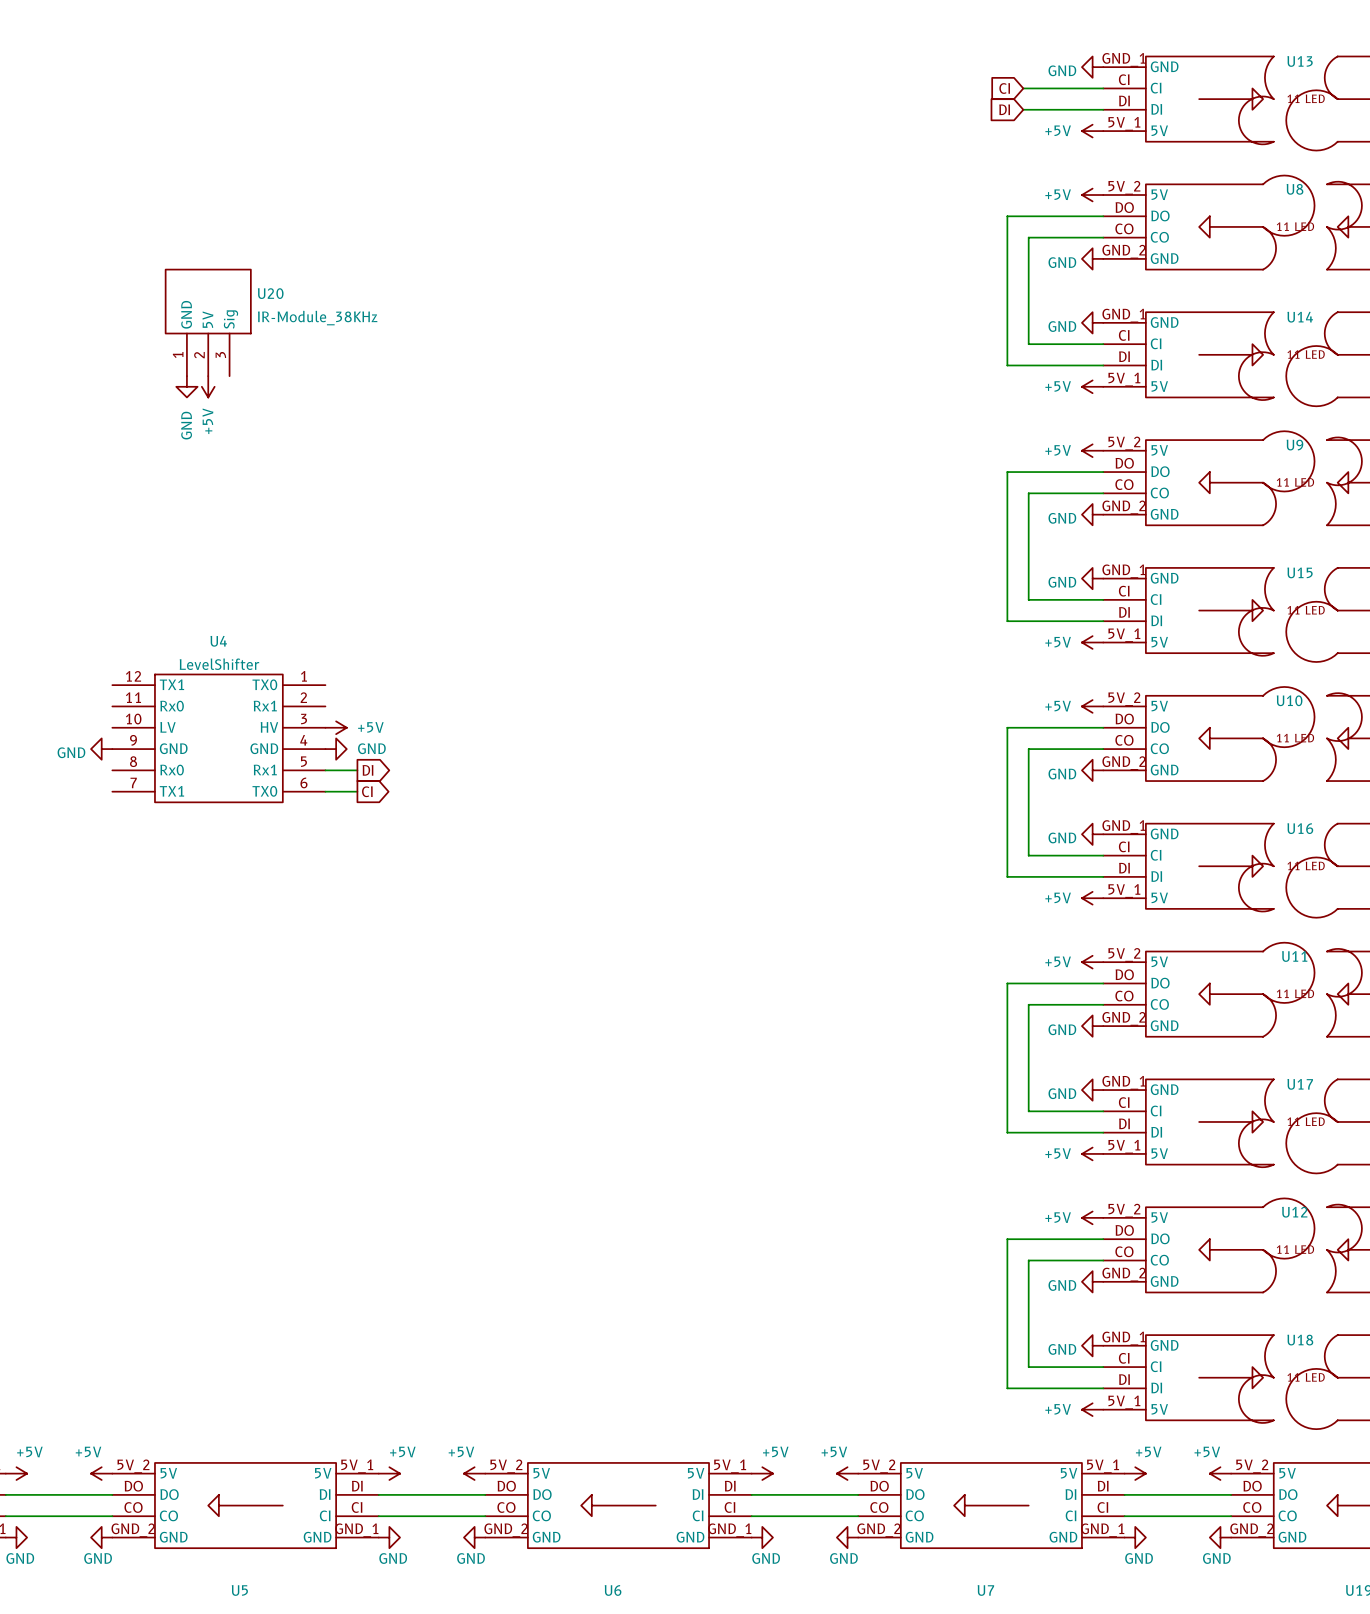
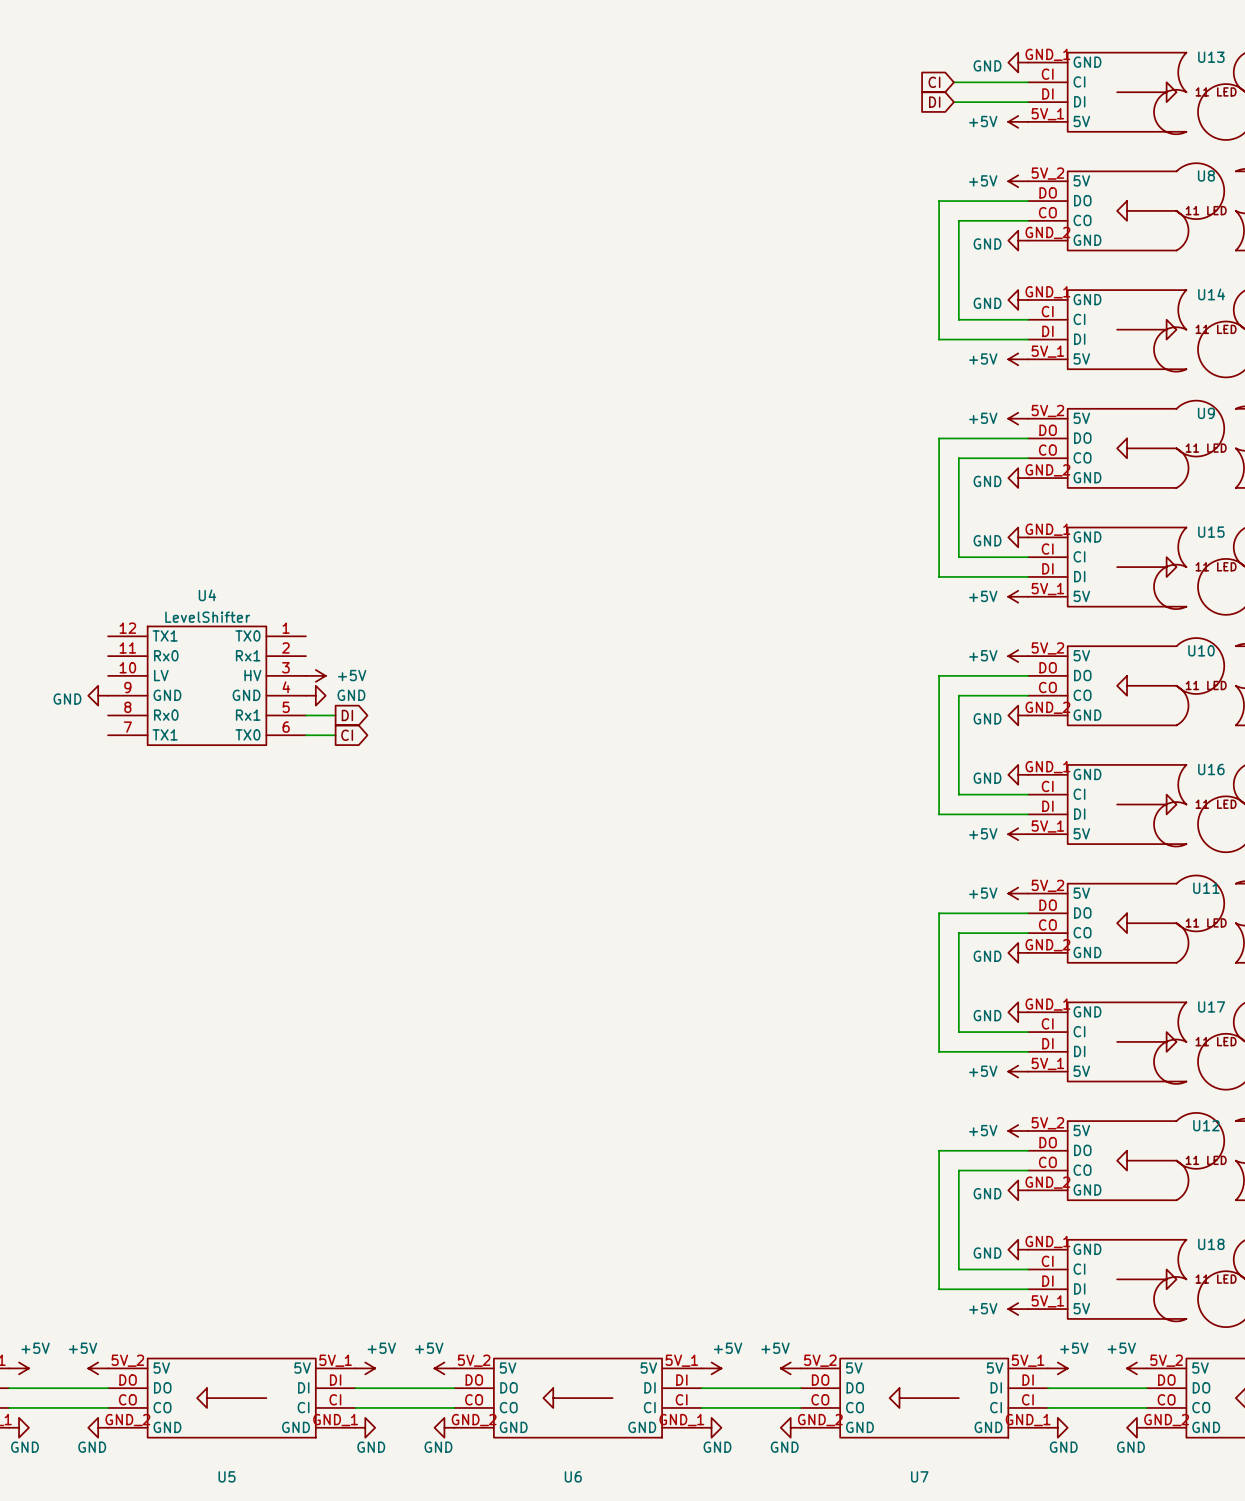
U20: IR-Module_38KHz (208, 322) -> none
power symbol: GND (186, 386) -> none
power symbol: +5V (208, 386) -> none

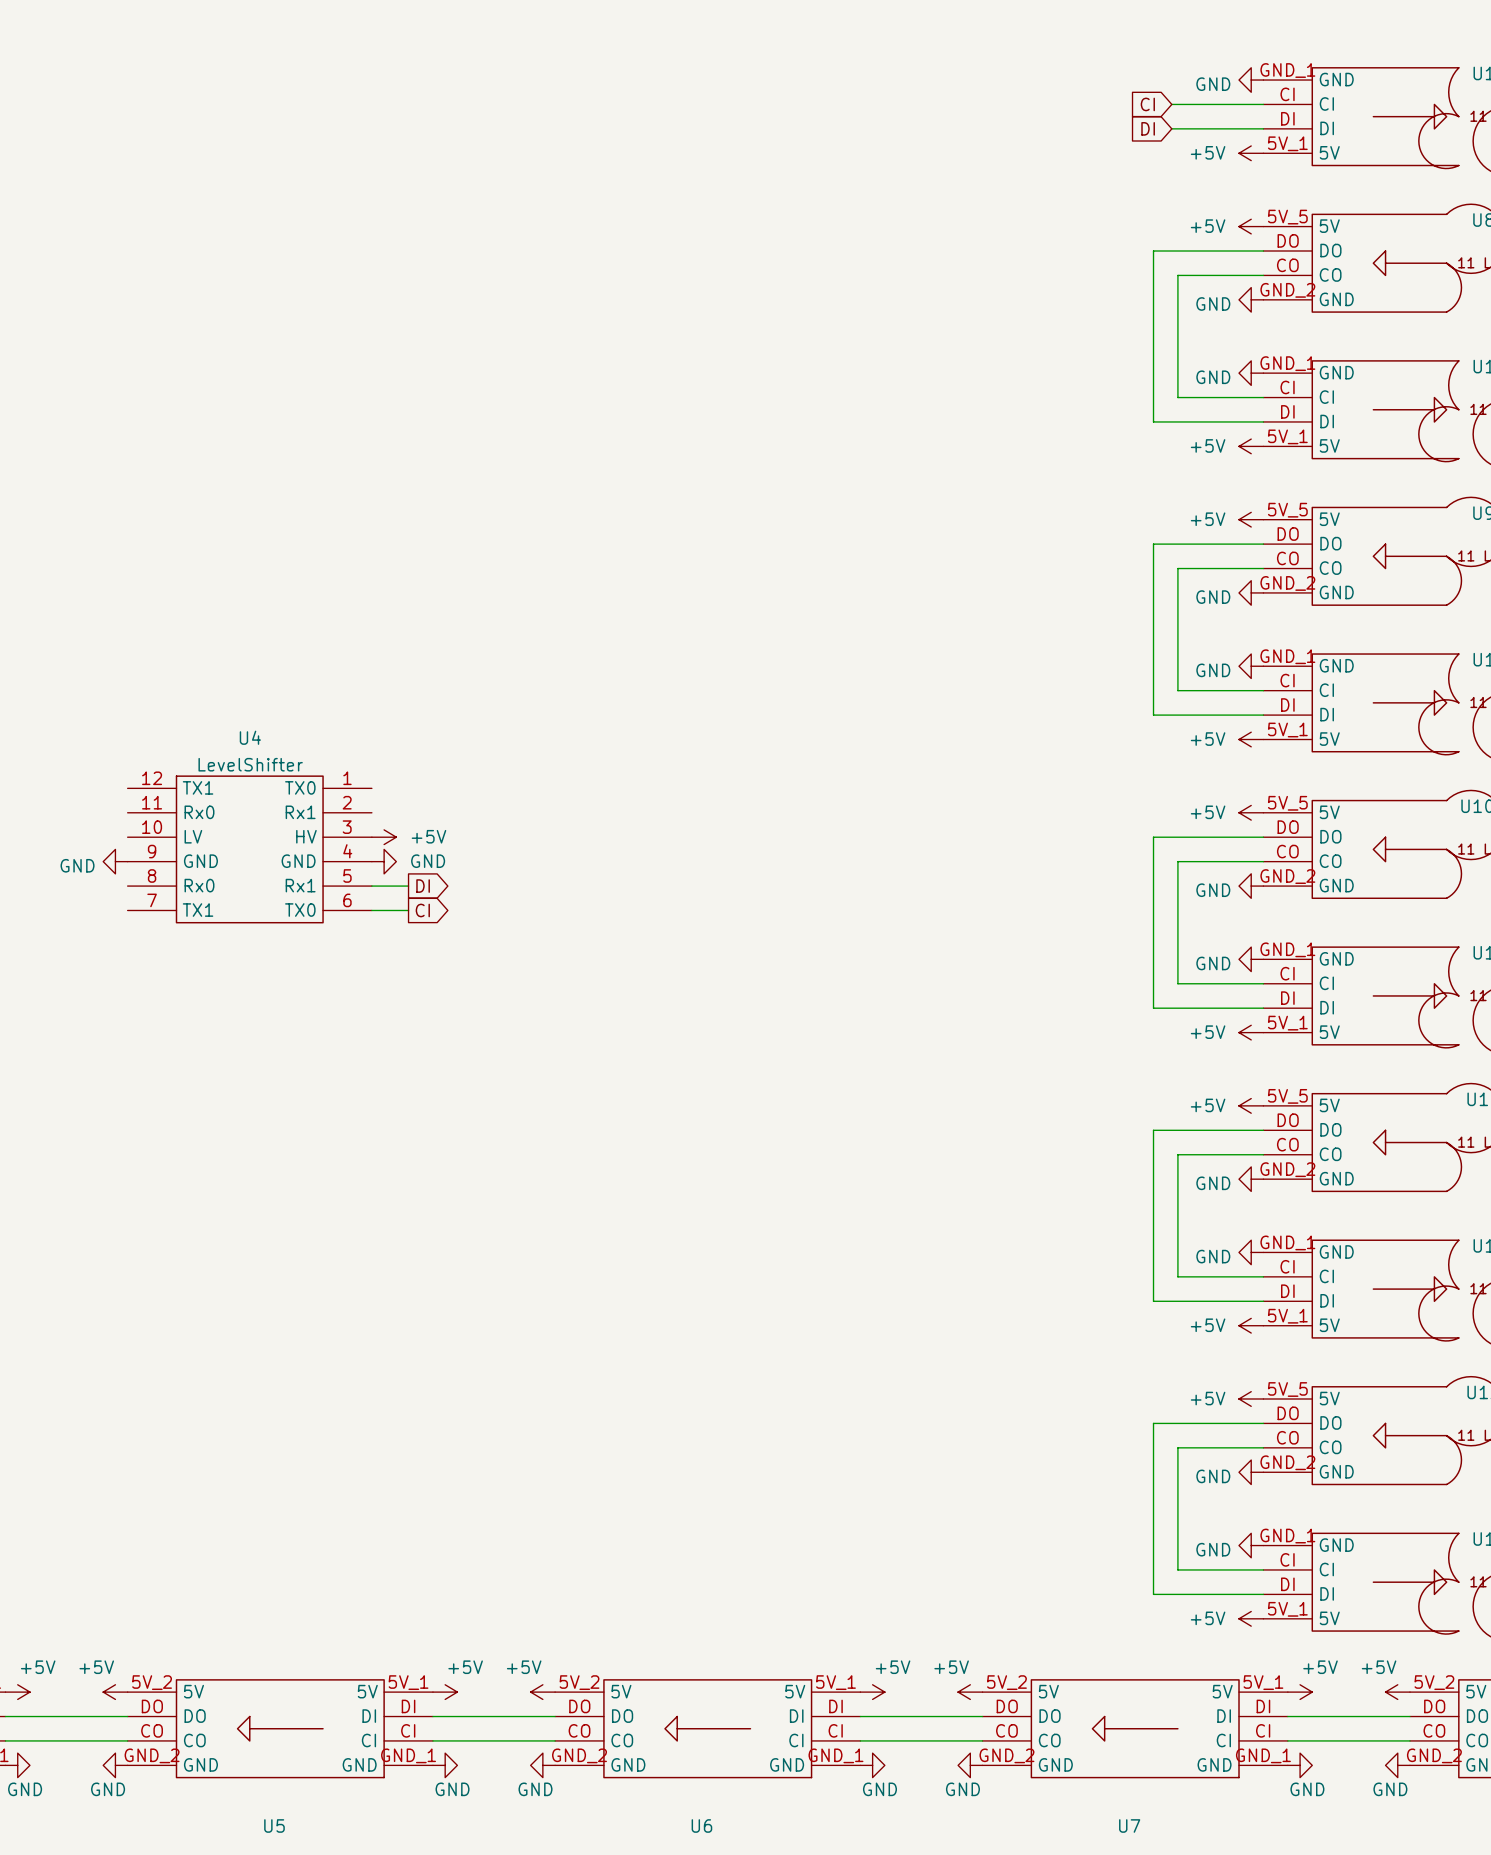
U8 pin number: 5V_2 (1047, 173) -> 5V_5 (1287, 217)
U9 pin number: 5V_2 (1047, 411) -> 5V_5 (1287, 510)
U10 pin number: 5V_2 (1047, 648) -> 5V_5 (1287, 803)
U11 pin number: 5V_2 (1047, 885) -> 5V_5 (1287, 1096)
U12 pin number: 5V_2 (1047, 1123) -> 5V_5 (1287, 1389)

